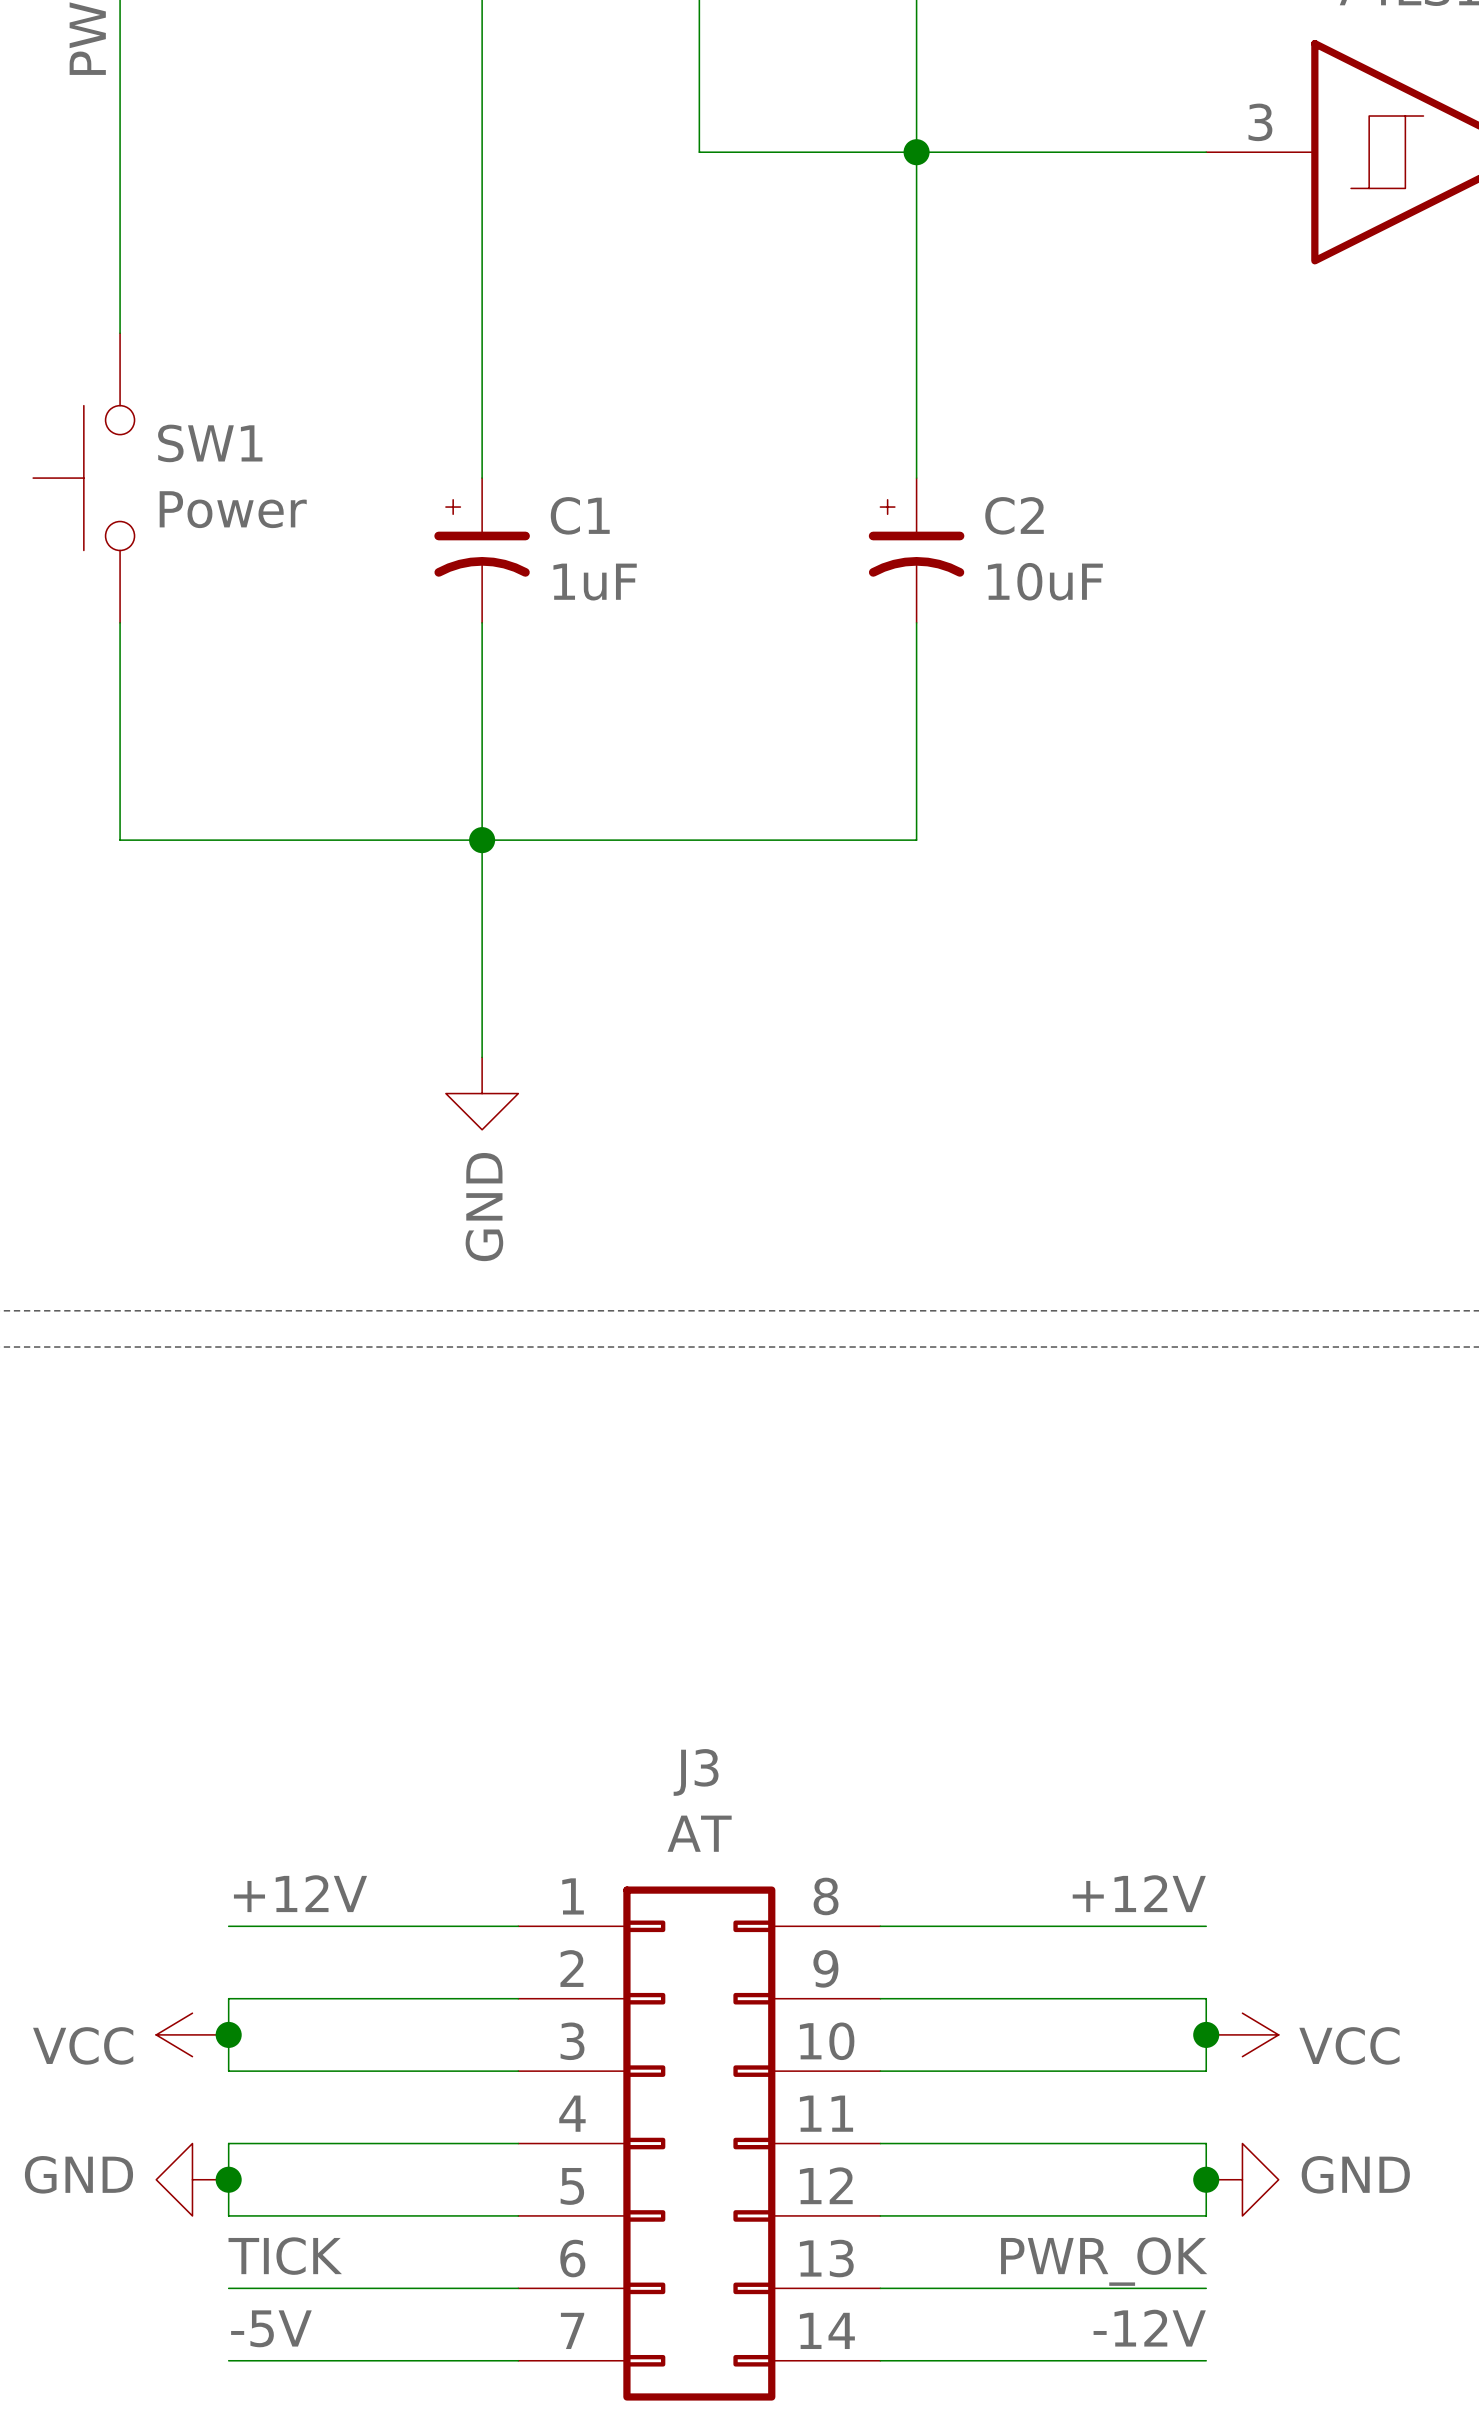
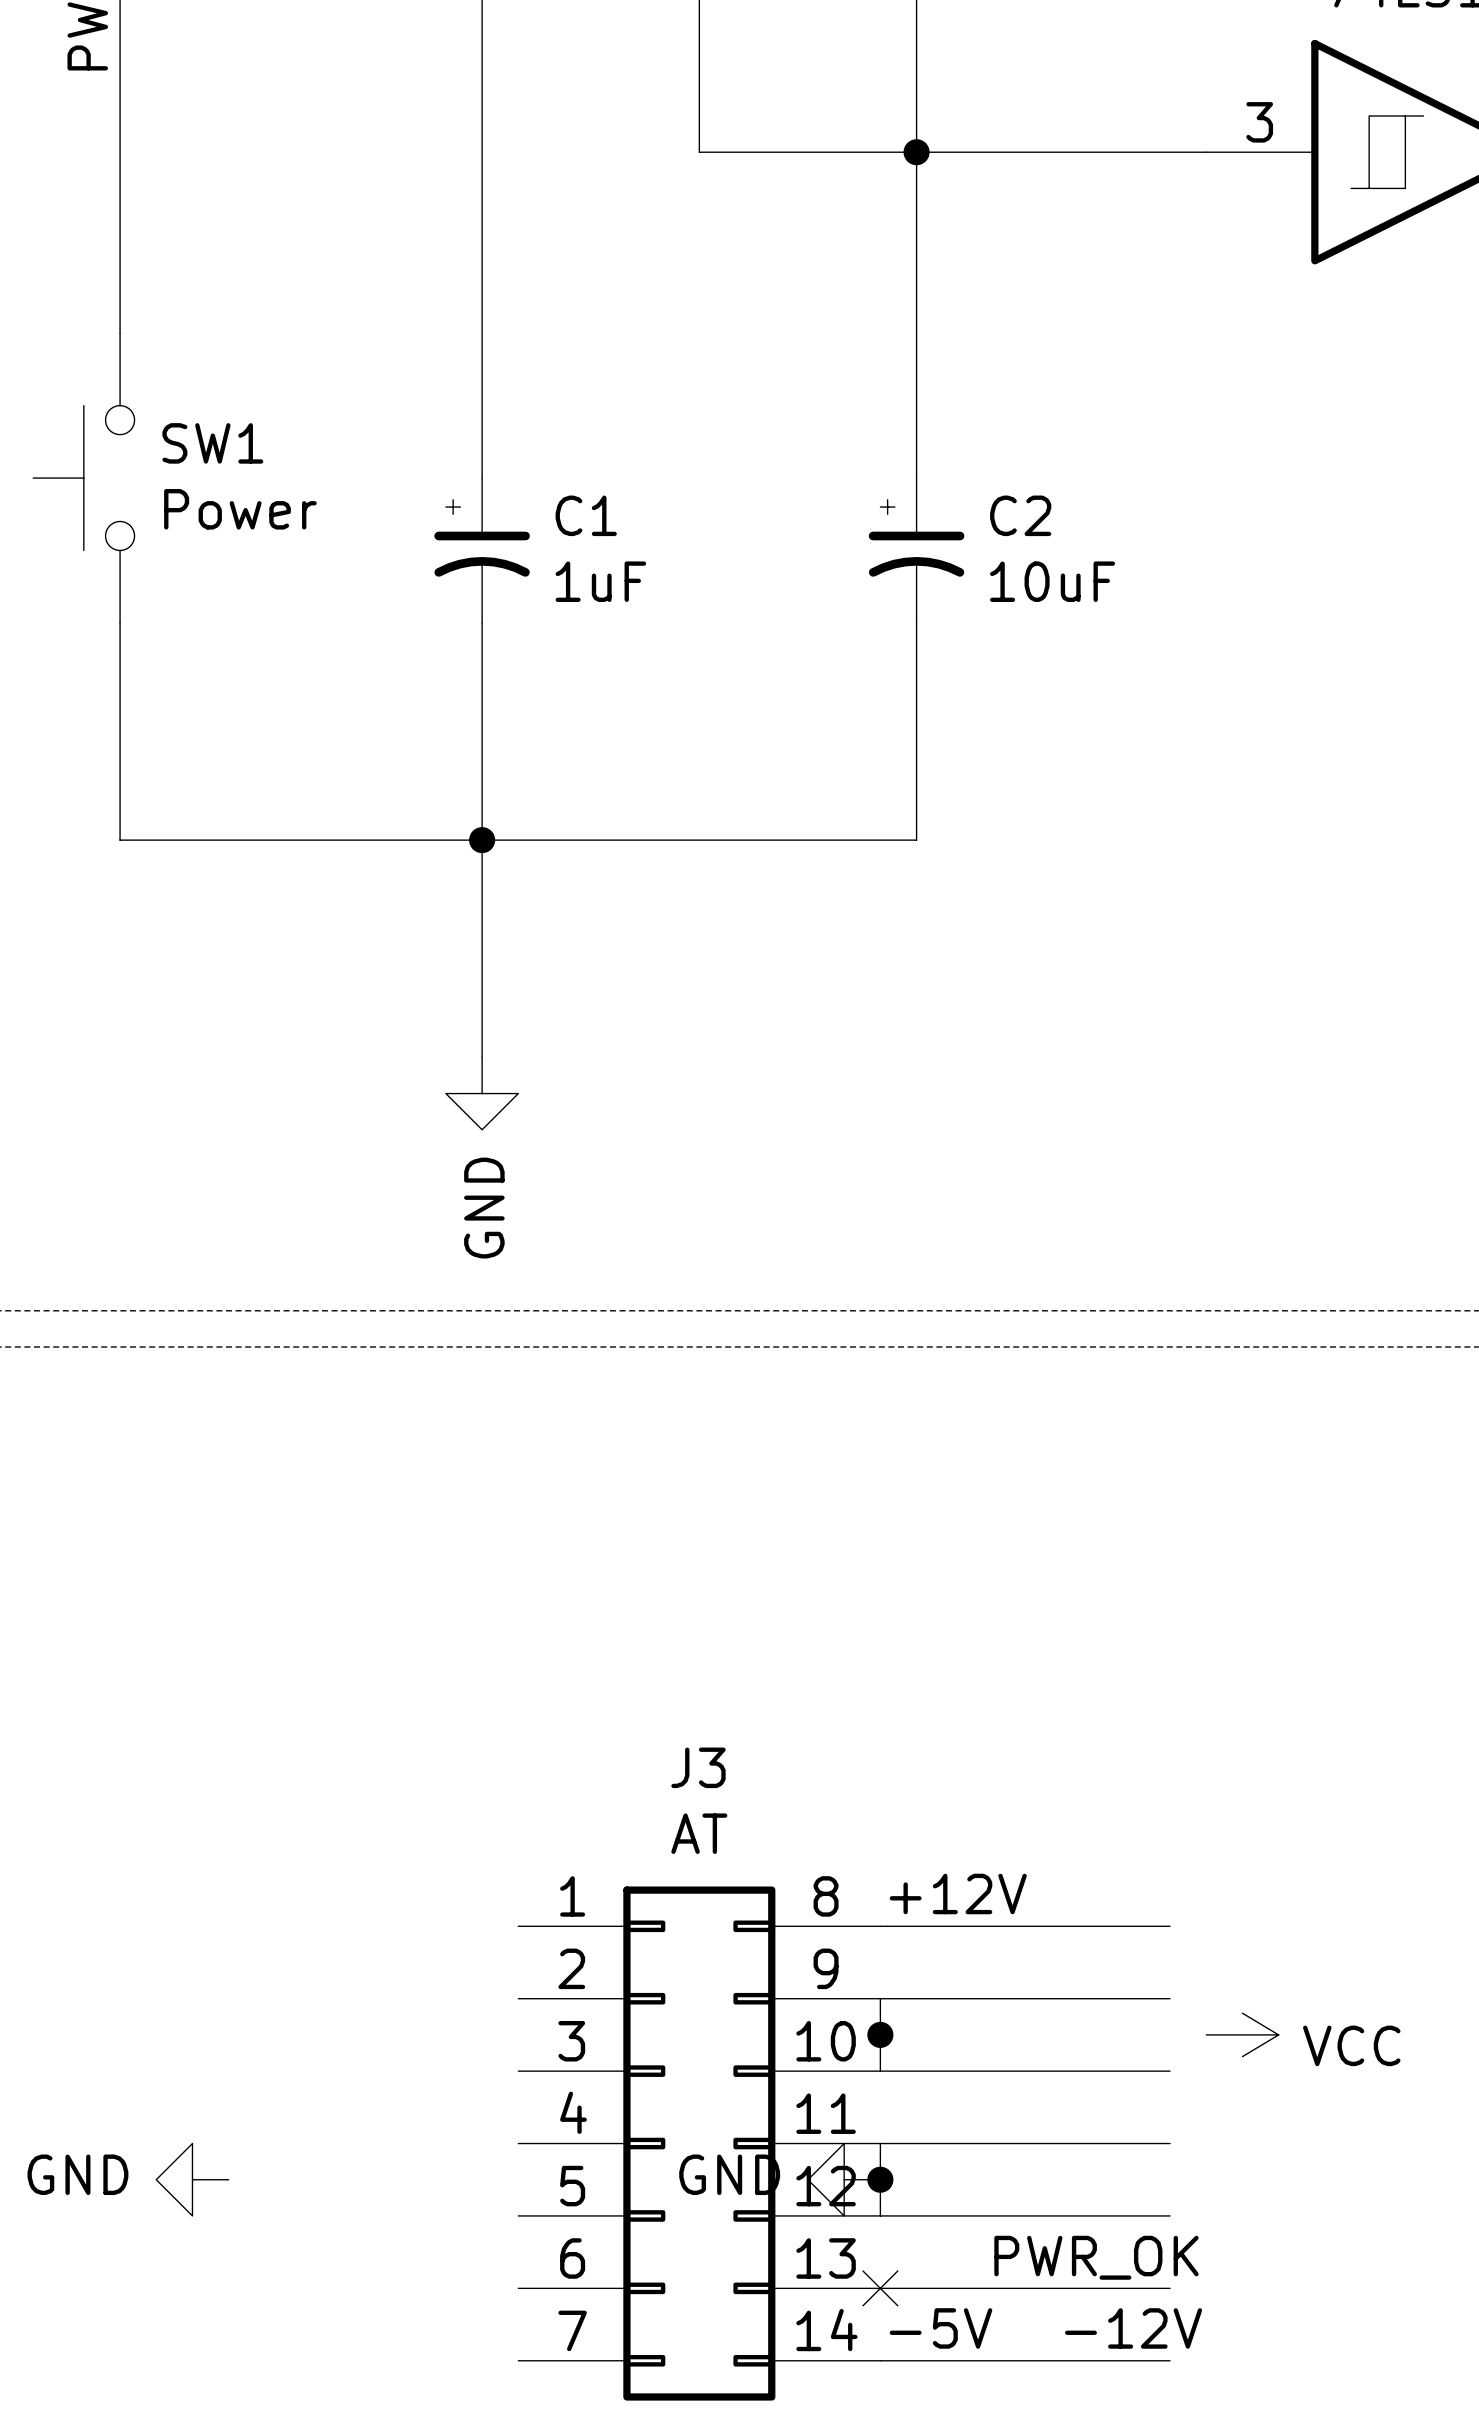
label: +12V (300, 1893) -> none
label position: +12V (1139, 1893) -> +12V (958, 1893)
wire: (228, 1926) (518, 1926) -> none
wire: (1170, 1926) (1206, 1926) -> none
wire: (518, 1998) (228, 1998) (228, 2071) (518, 2071) -> none
wire: none -> (880, 1998) (880, 2071)
wire: (1170, 1998) (1206, 1998) (1206, 2071) (1170, 2071) -> none
power symbol: VCC (192, 2034) -> none
junction: (228, 2034) -> none
junction: none -> (880, 2034)
junction: (1206, 2034) -> none
wire: (518, 2143) (228, 2143) (228, 2215) (518, 2215) -> none
wire: none -> (880, 2143) (880, 2215)
wire: (1170, 2143) (1206, 2143) (1206, 2215) (1170, 2215) -> none
junction: (228, 2179) -> none
power symbol: none -> GND (844, 2179)
junction: none -> (880, 2179)
junction: (1206, 2179) -> none
power symbol: GND (1242, 2179) -> none
label: TICK (285, 2256) -> none
wire: (228, 2288) (518, 2288) -> none
no-connect mark: none -> (880, 2288)
wire: (1170, 2288) (1206, 2288) -> none
label position: -5V (271, 2328) -> -5V (940, 2328)
wire: (228, 2360) (518, 2360) -> none
wire: (1170, 2360) (1206, 2360) -> none

